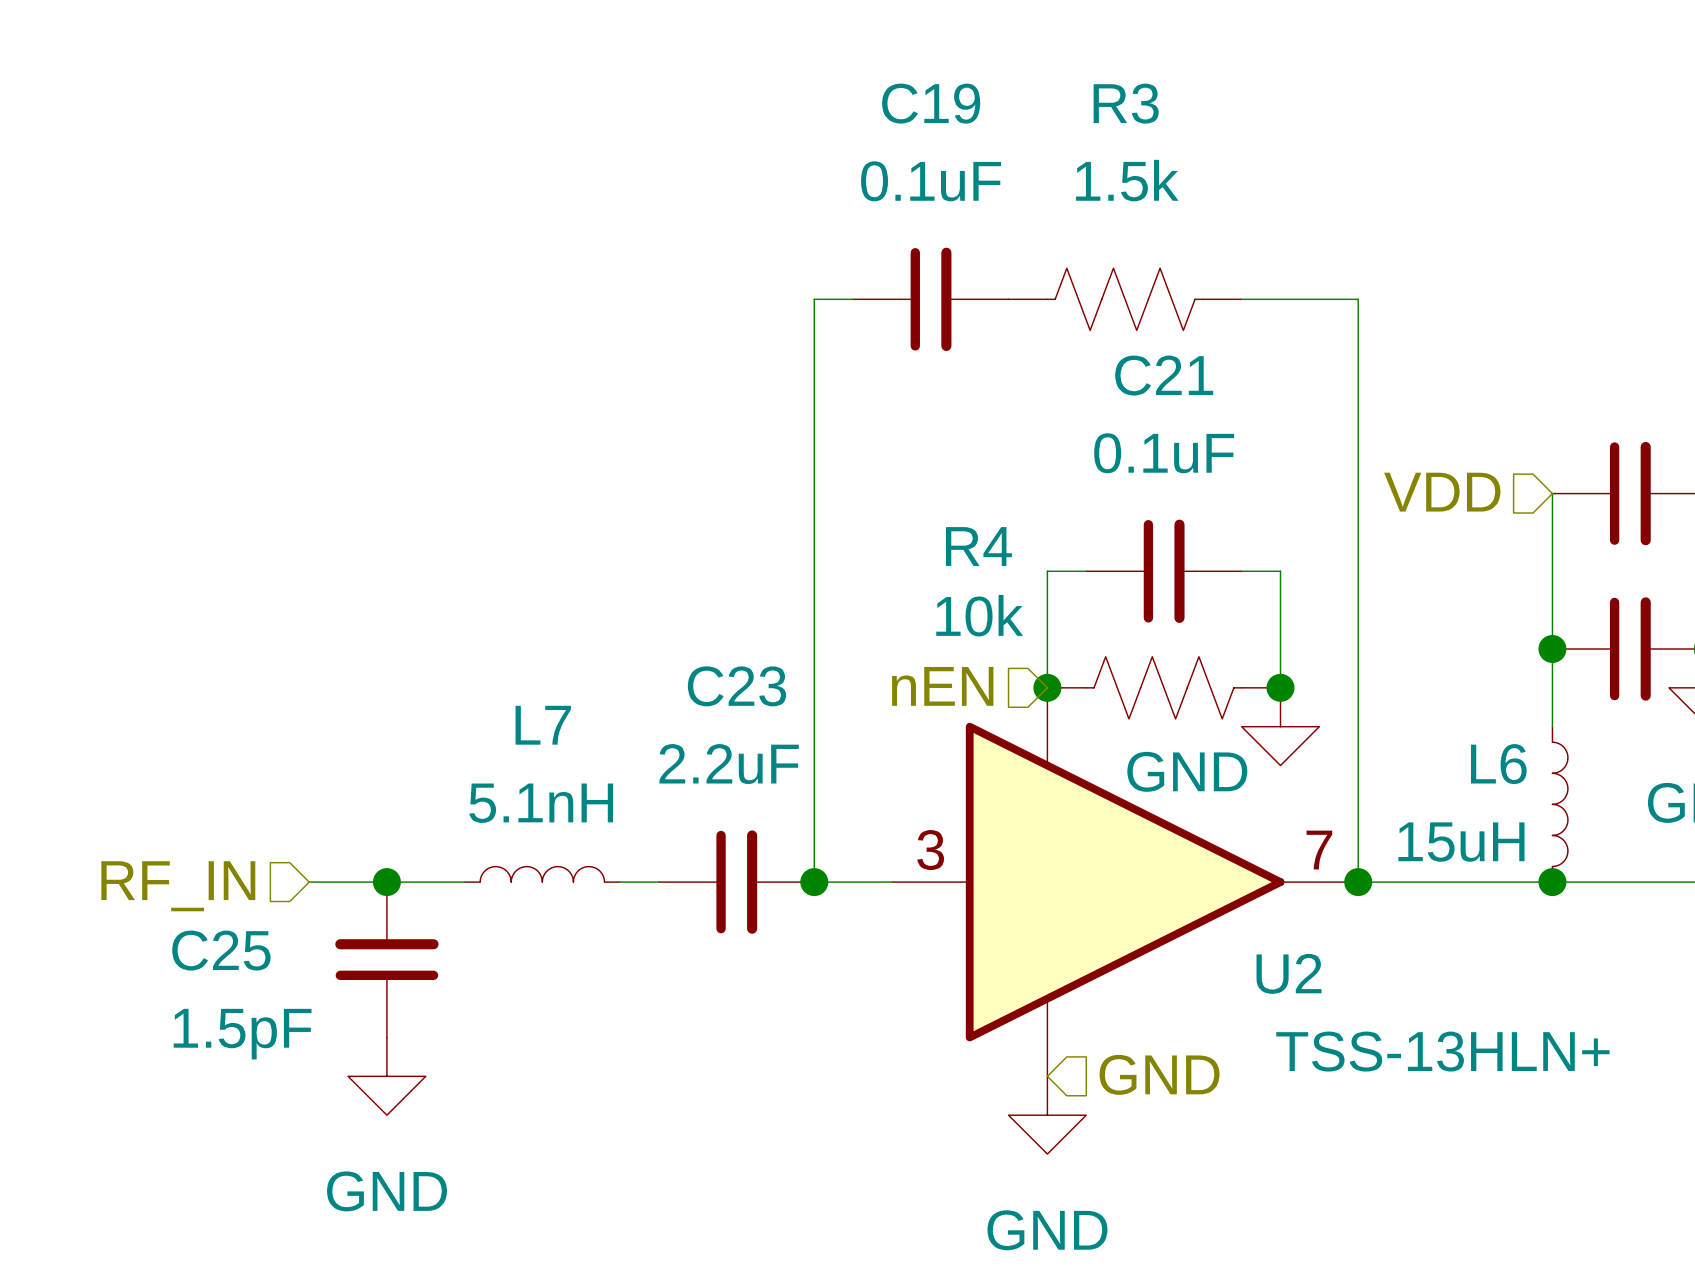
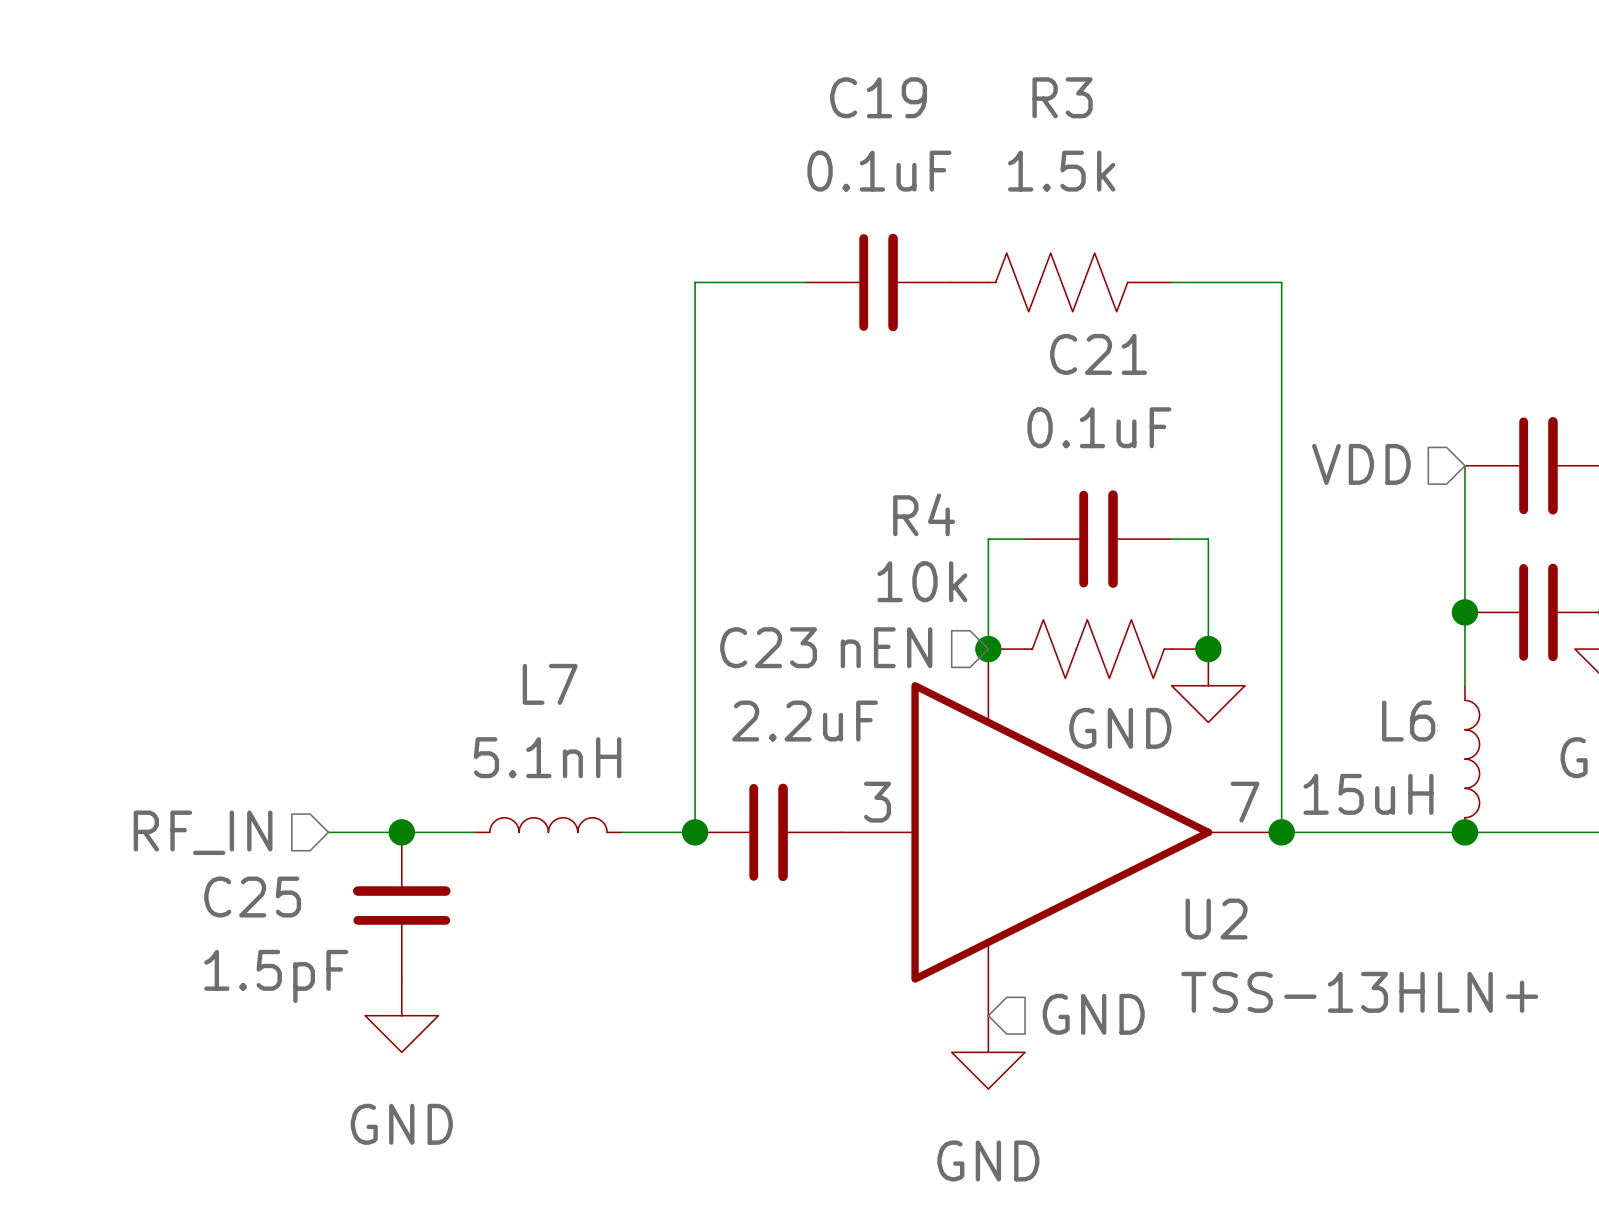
wire: (814, 299) (814, 882) (891, 882) -> (768, 282) (695, 282) (695, 832) (621, 832)
C23 value position: 2.2uF (729, 764) -> 2.2uF (805, 721)
L7 position: (542, 874) -> (548, 825)
wire: (309, 882) (348, 882) -> (438, 832) (475, 832)
junction position: (386, 882) -> (401, 832)
wire: (620, 882) (658, 882) -> none
C23 position: (736, 882) -> (768, 832)
junction position: (814, 882) -> (695, 832)
hierarchical label position: RF_IN (178, 886) -> RF_IN (203, 832)
C25 position: (386, 959) -> (401, 905)
power symbol position: GND (386, 1076) -> GND (401, 1015)

